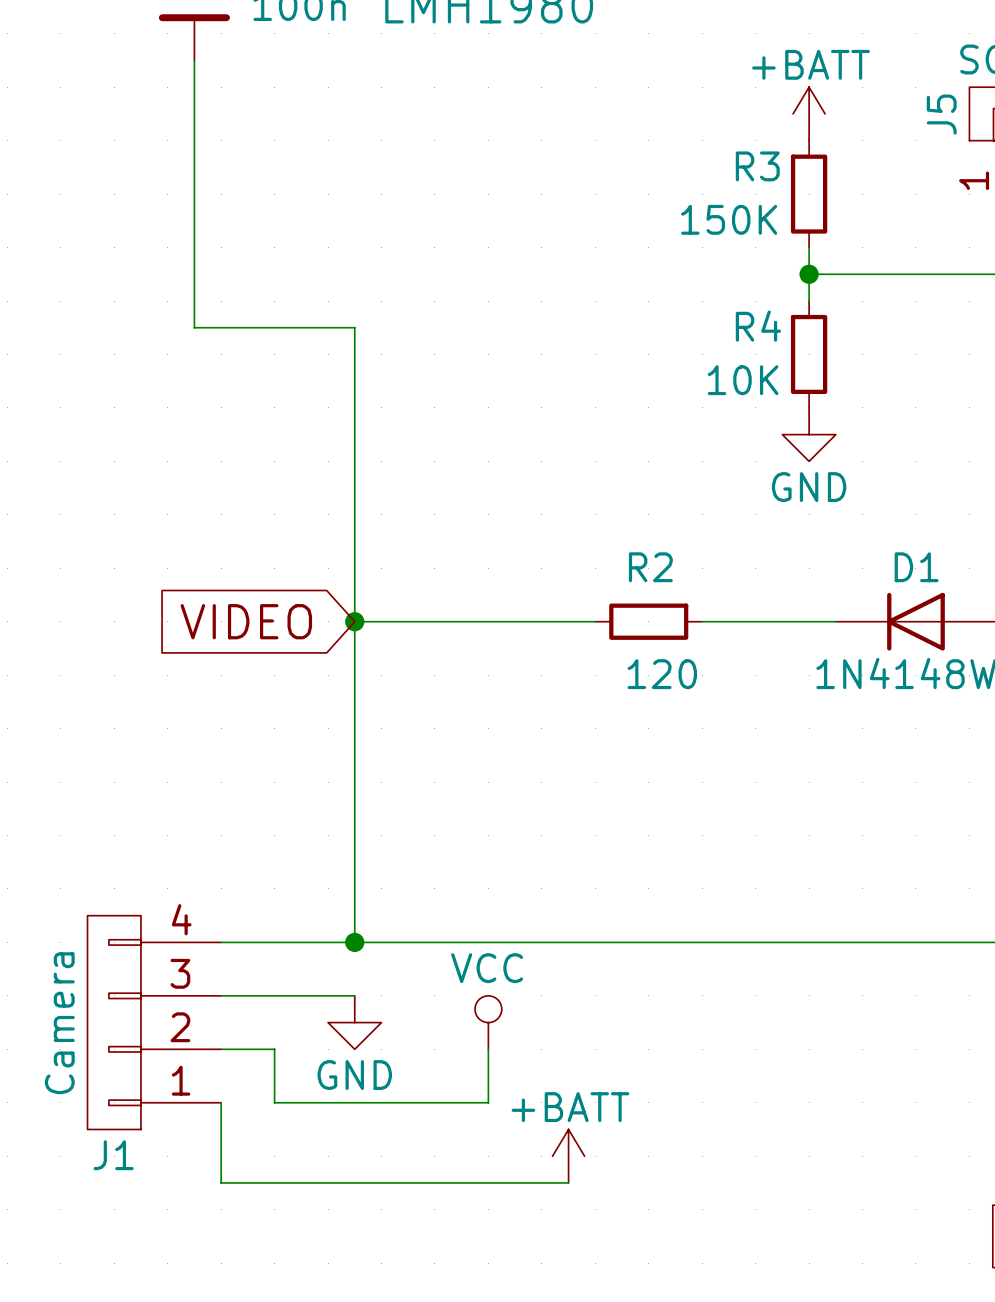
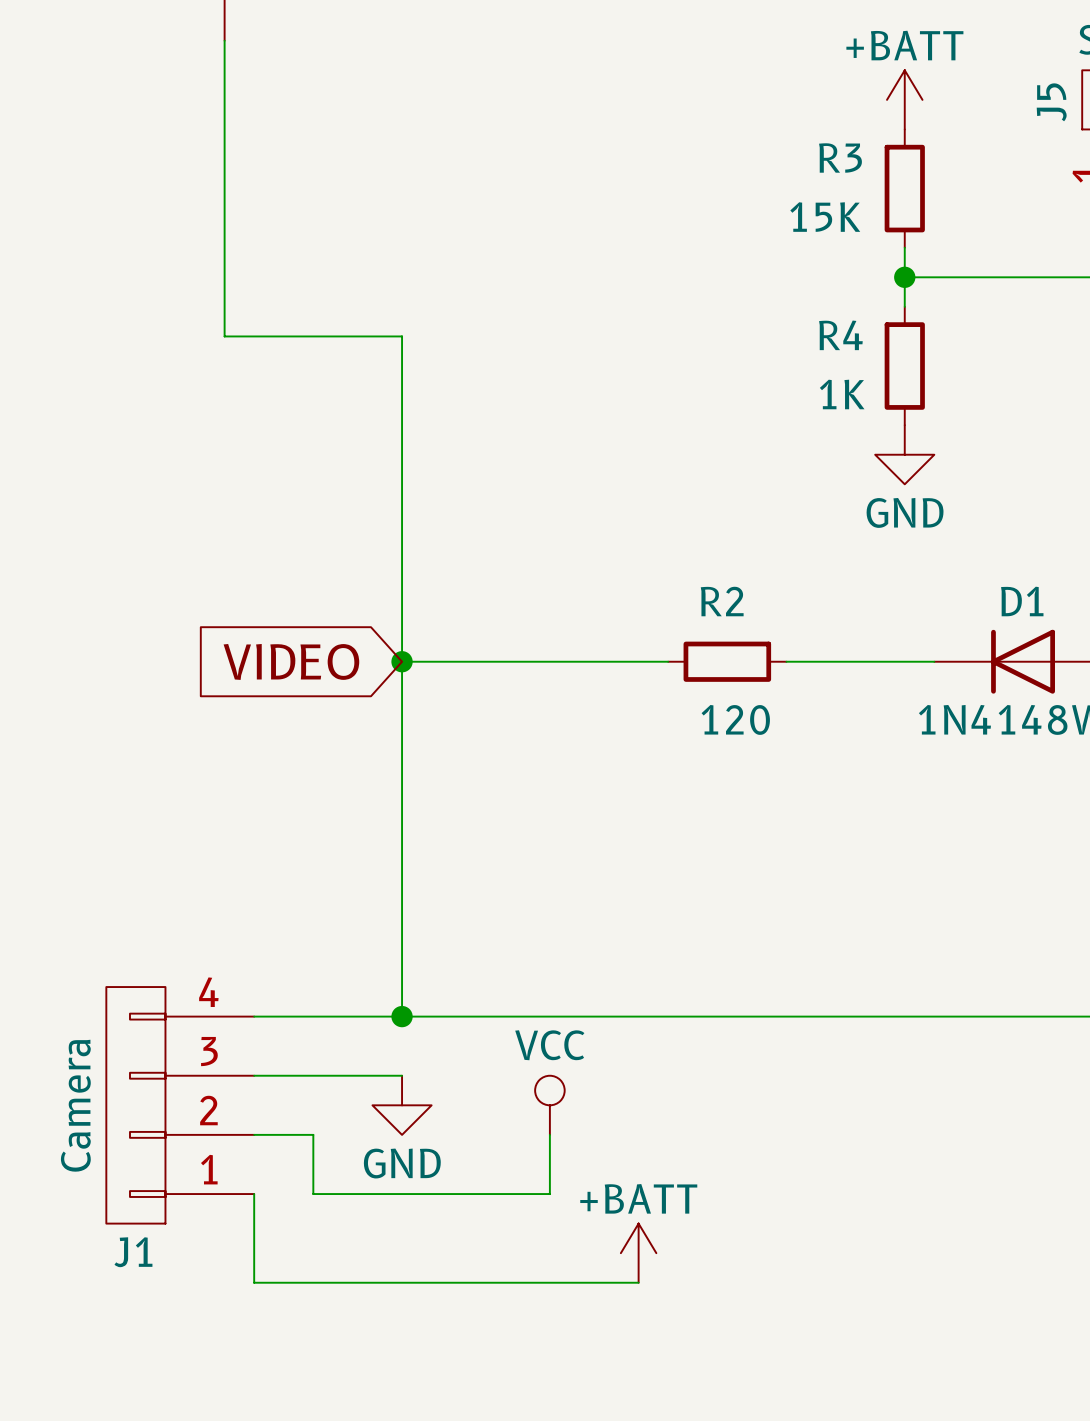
R3 value: 150K (729, 219) -> 15K (825, 217)
R4 value: 10K (743, 380) -> 1K (842, 394)

